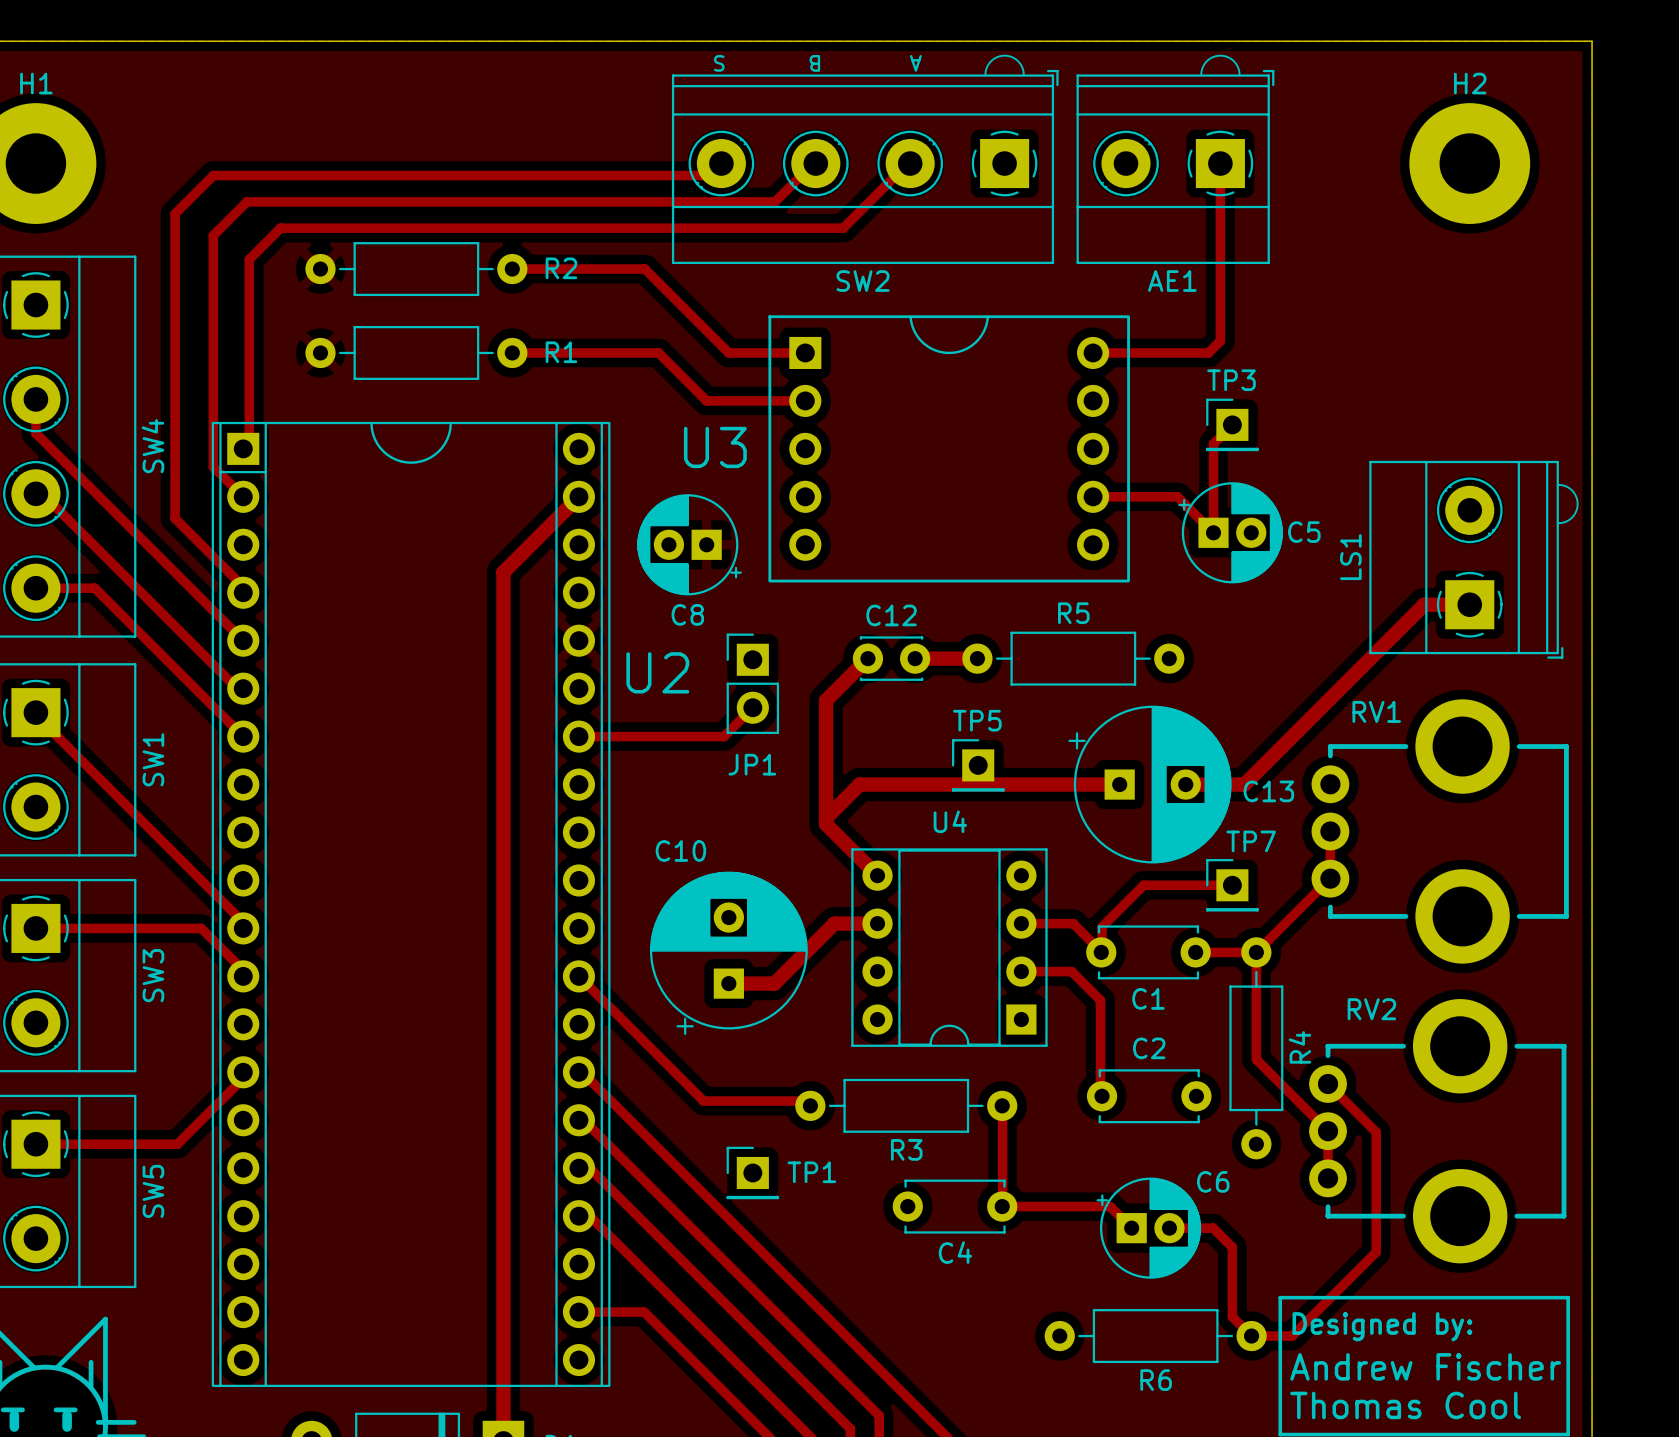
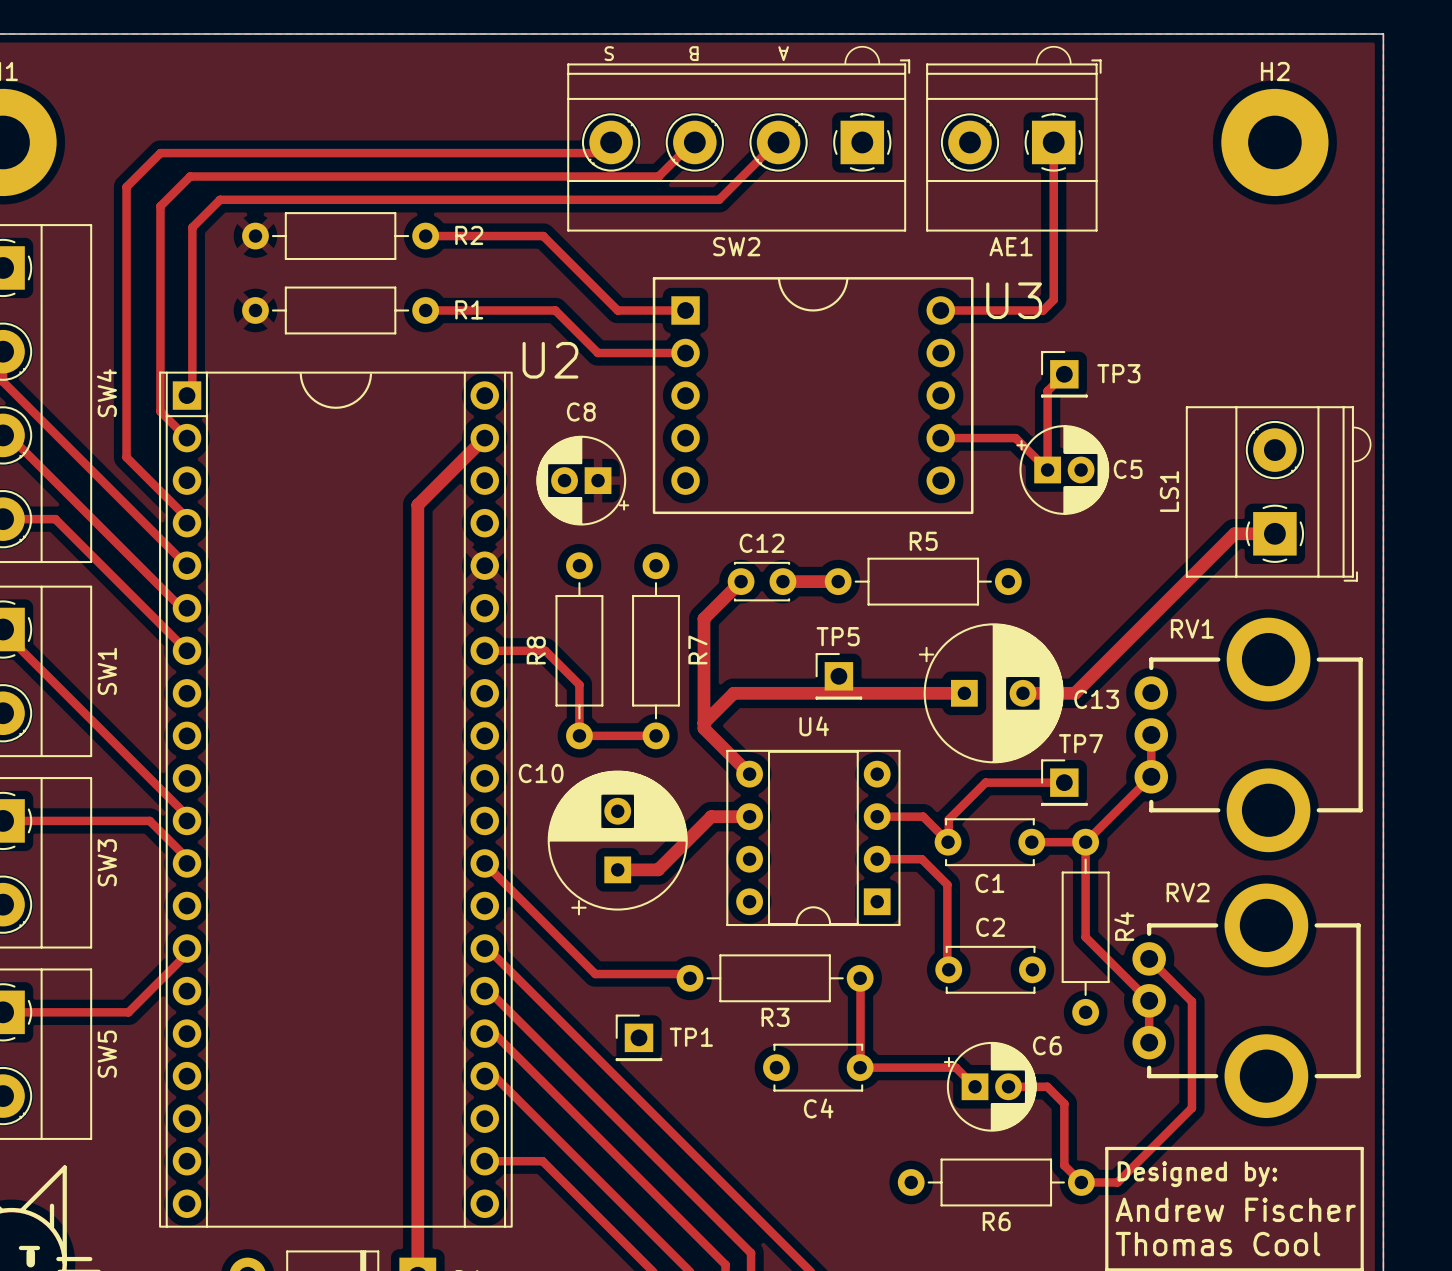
TP3 name position: TP3 (1231, 380) -> TP3 (1118, 373)
U3 name position: U3 (715, 447) -> U3 (1014, 300)
C8 name position: C8 (687, 614) -> C8 (581, 411)
U2 name position: U2 (657, 672) -> U2 (550, 360)
JP1: (752, 683) -> none
track: (752, 707) (723, 736) (647, 736) -> (656, 735) (579, 735) (579, 684) (545, 650)
R8: none -> (579, 650)
R7: none -> (656, 650)
C10 name position: C10 (680, 850) -> C10 (541, 773)

